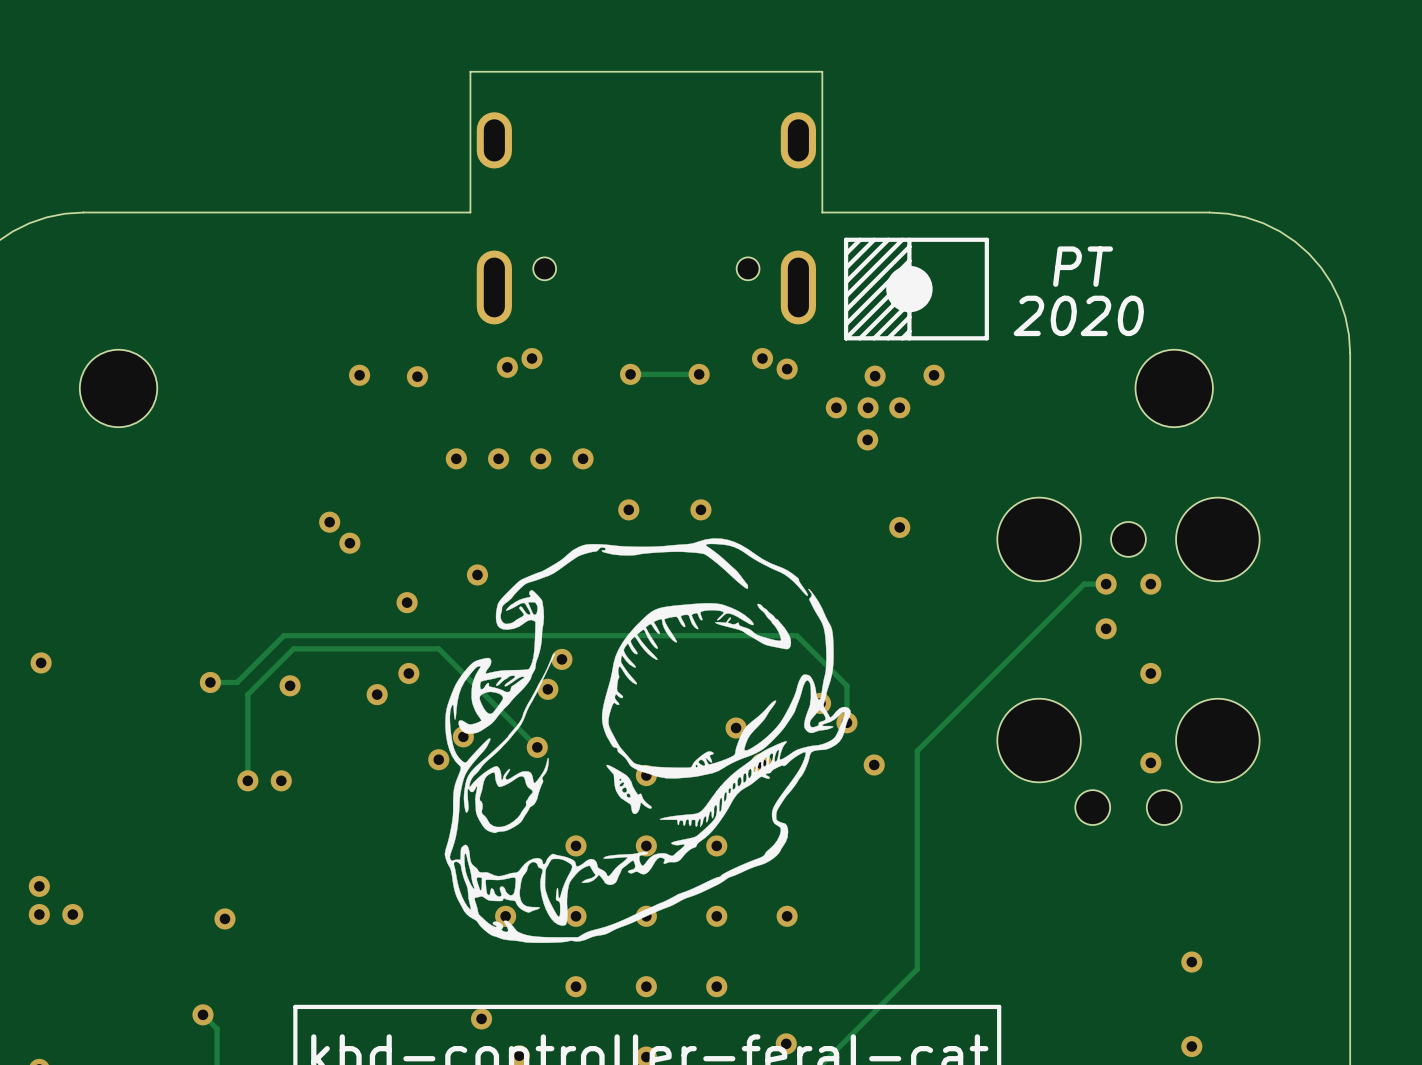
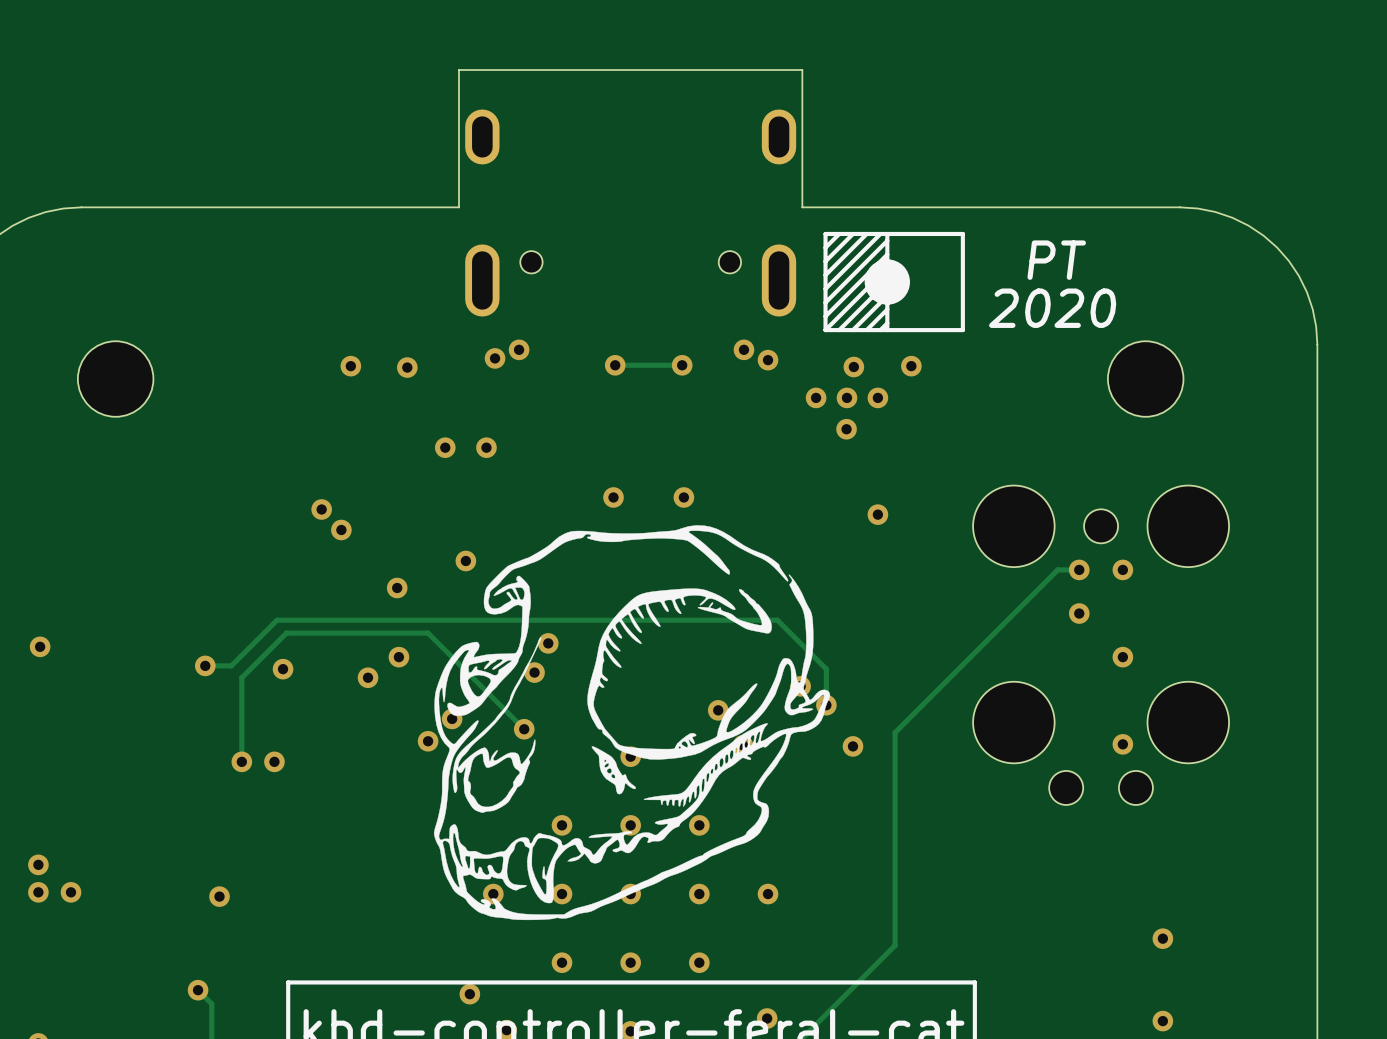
via: (540, 458) -> none
via: (583, 458) -> none

